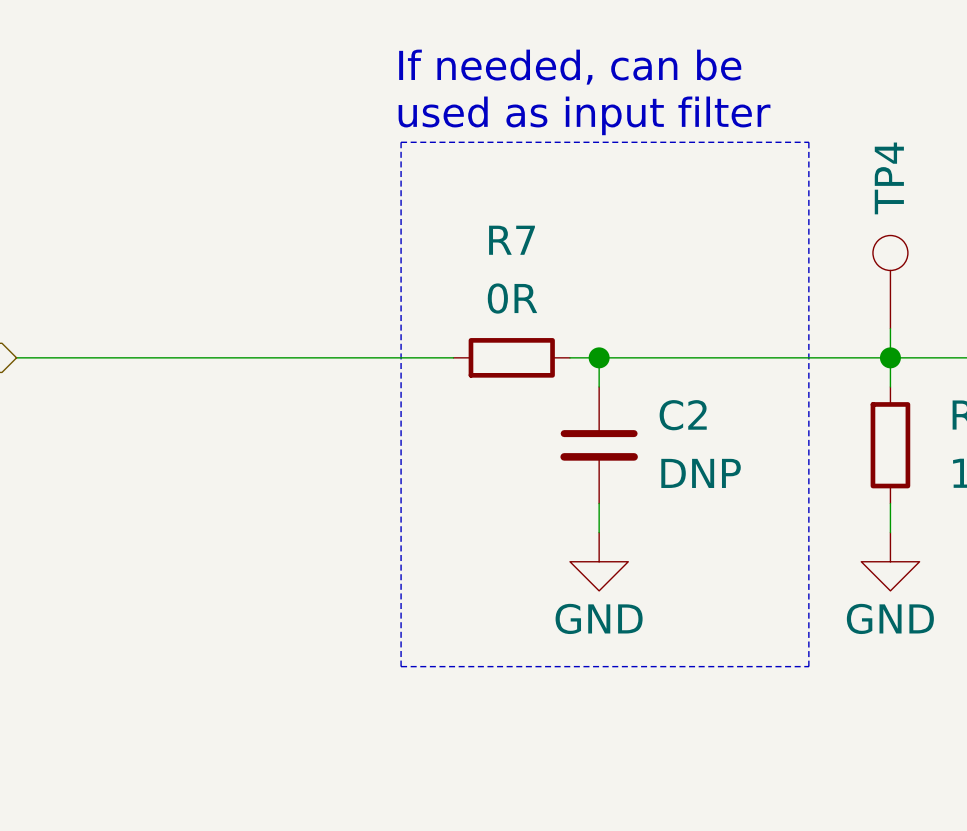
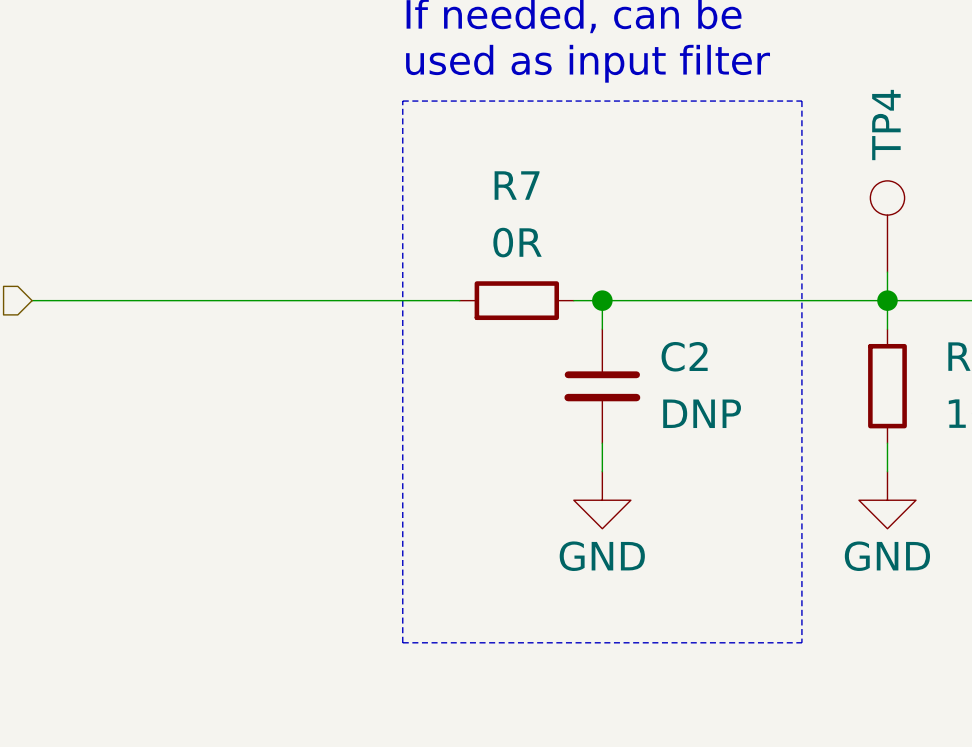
line: (401, 142) (401, 666) (808, 666) (808, 142) (401, 142) -> (402, 101) (402, 642) (801, 642) (801, 101) (402, 101)

